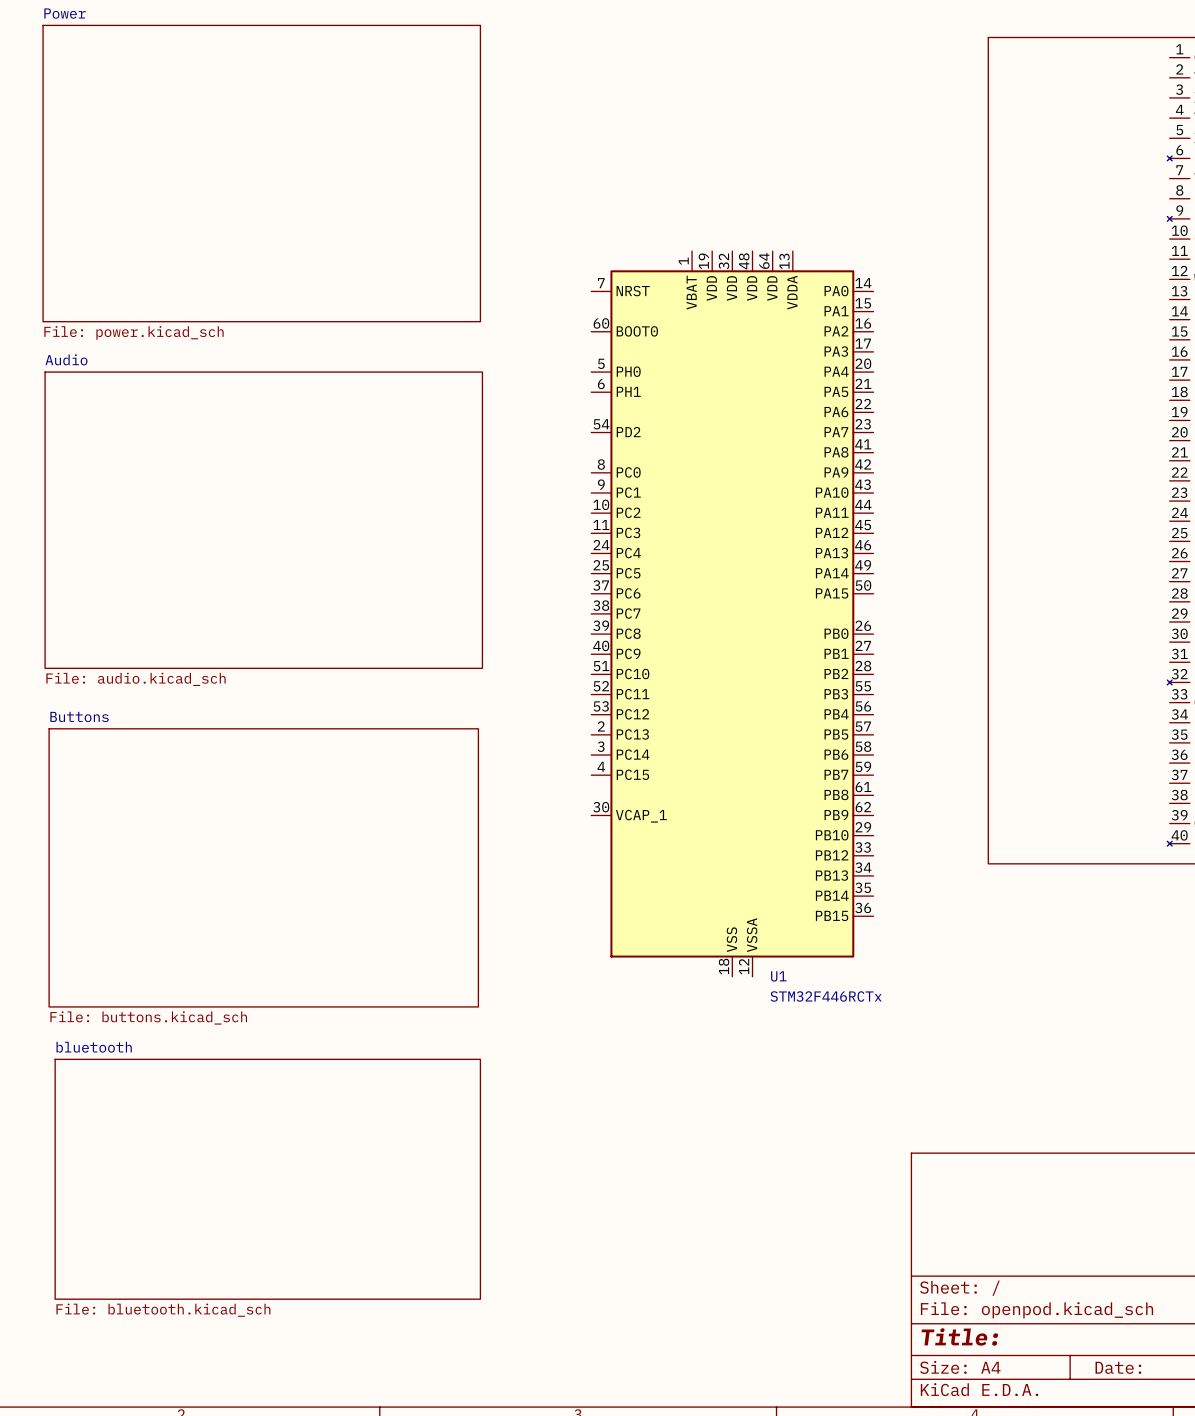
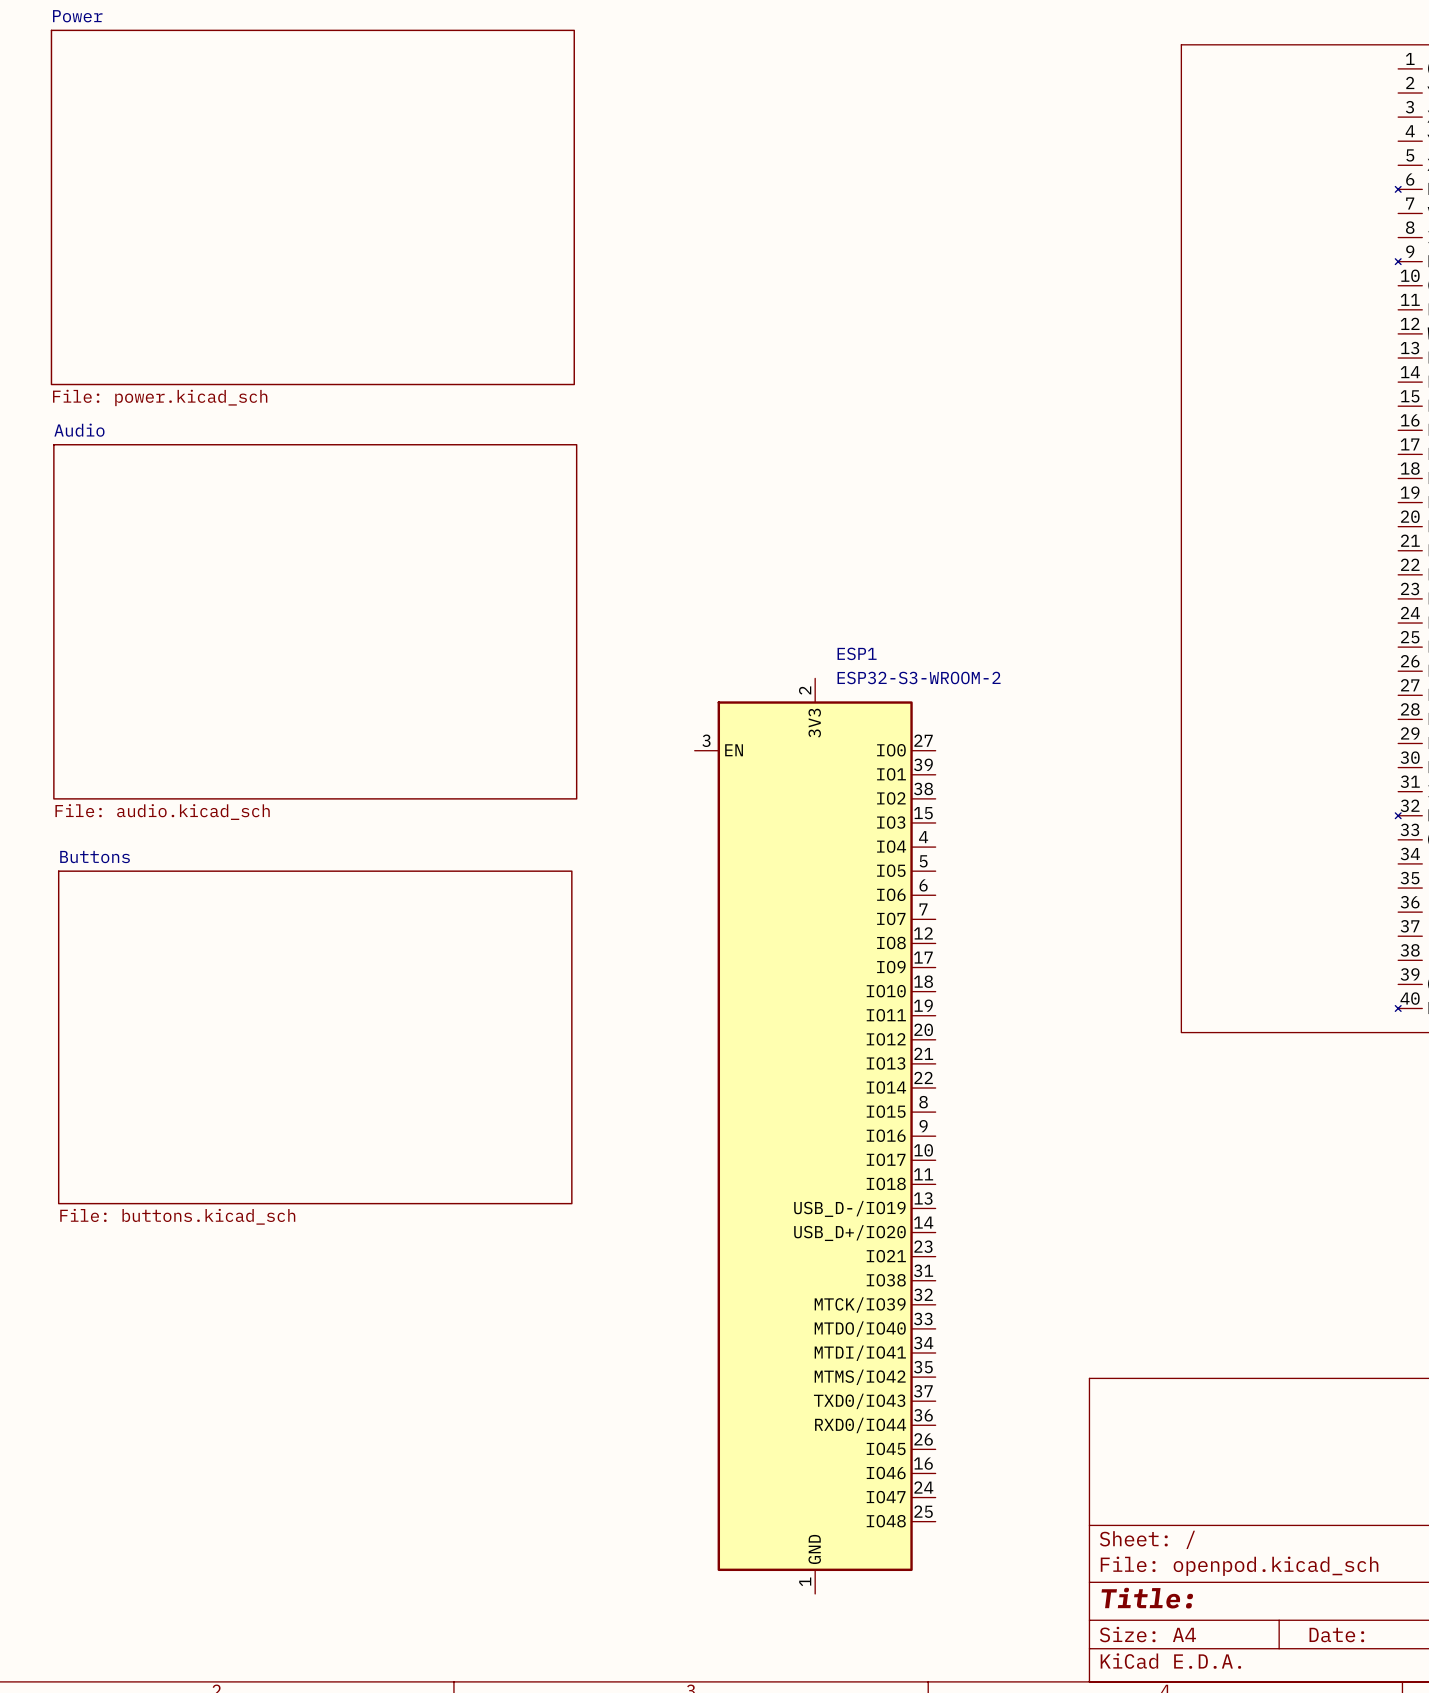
U1: STM32F446RCTx (732, 613) -> none
ESP1: none -> ESP32-S3-WROOM-2 (815, 1136)
sheet bluetooth: File: bluetooth.kicad_sch (267, 1179) -> none

